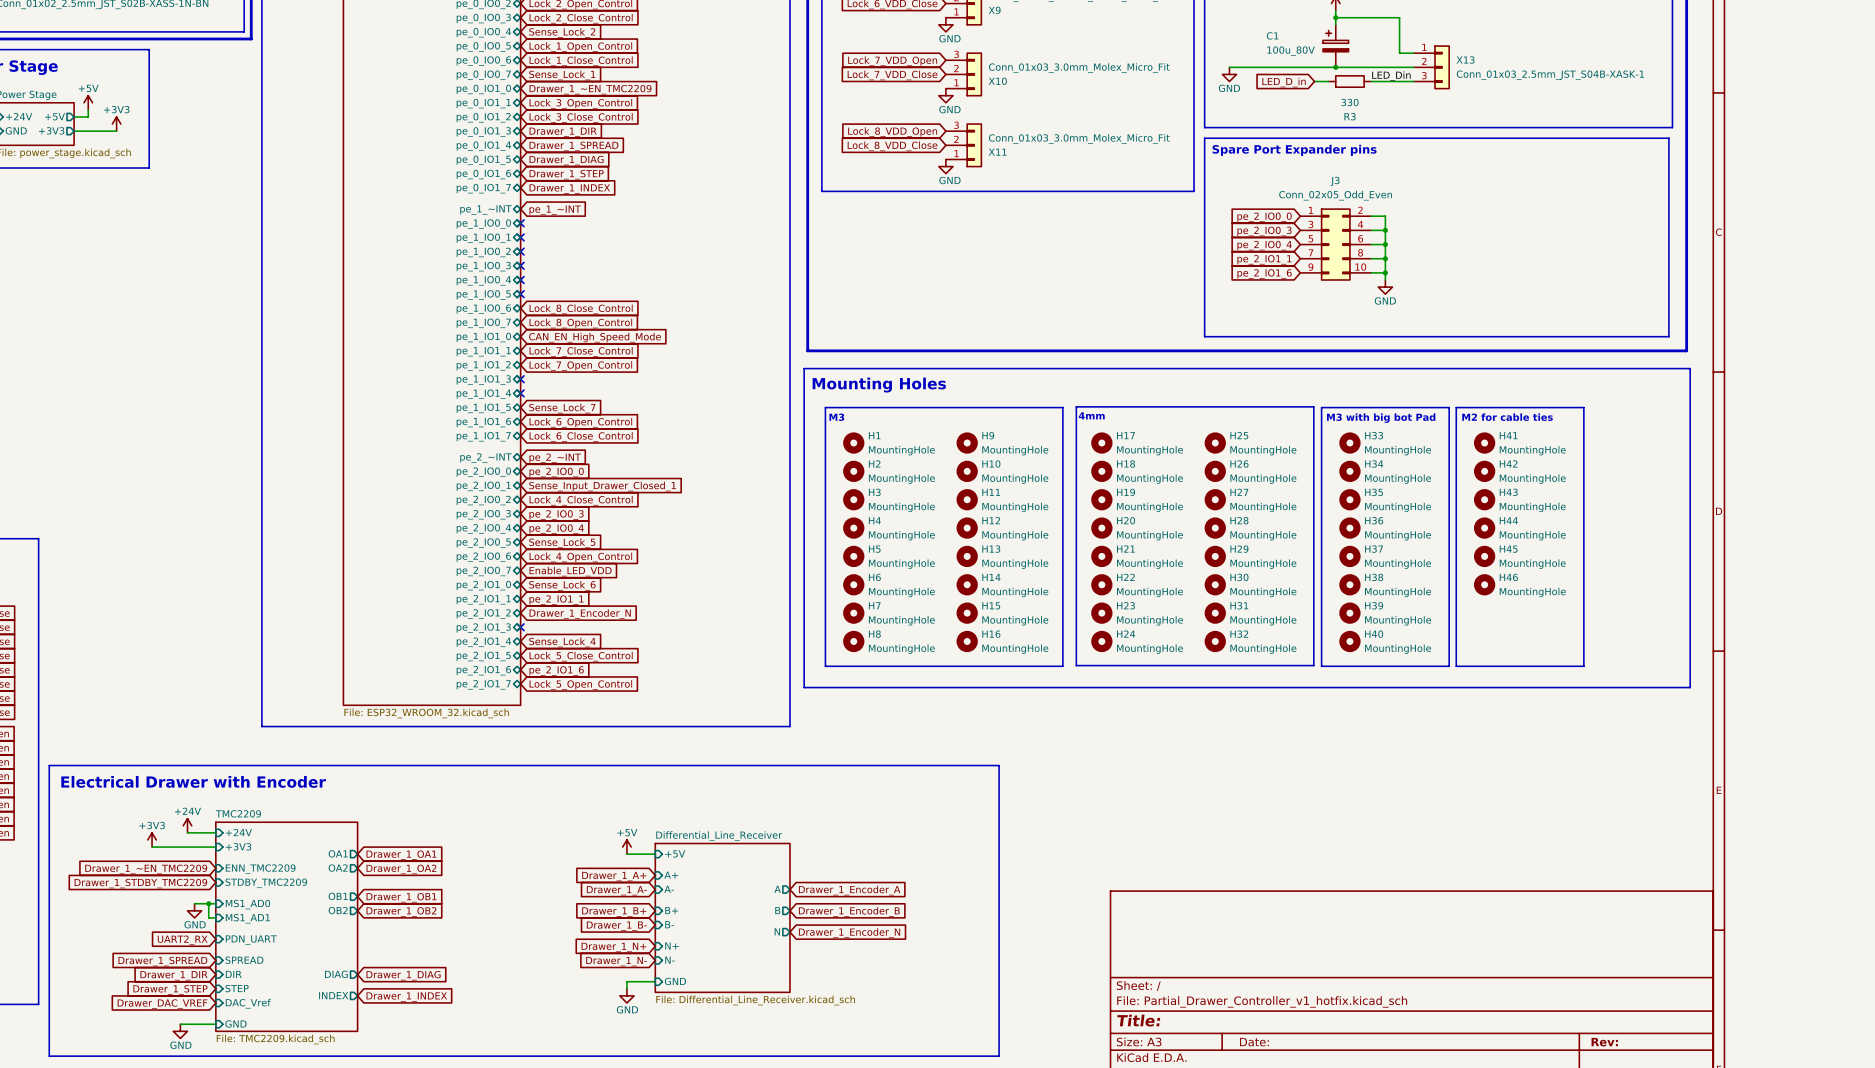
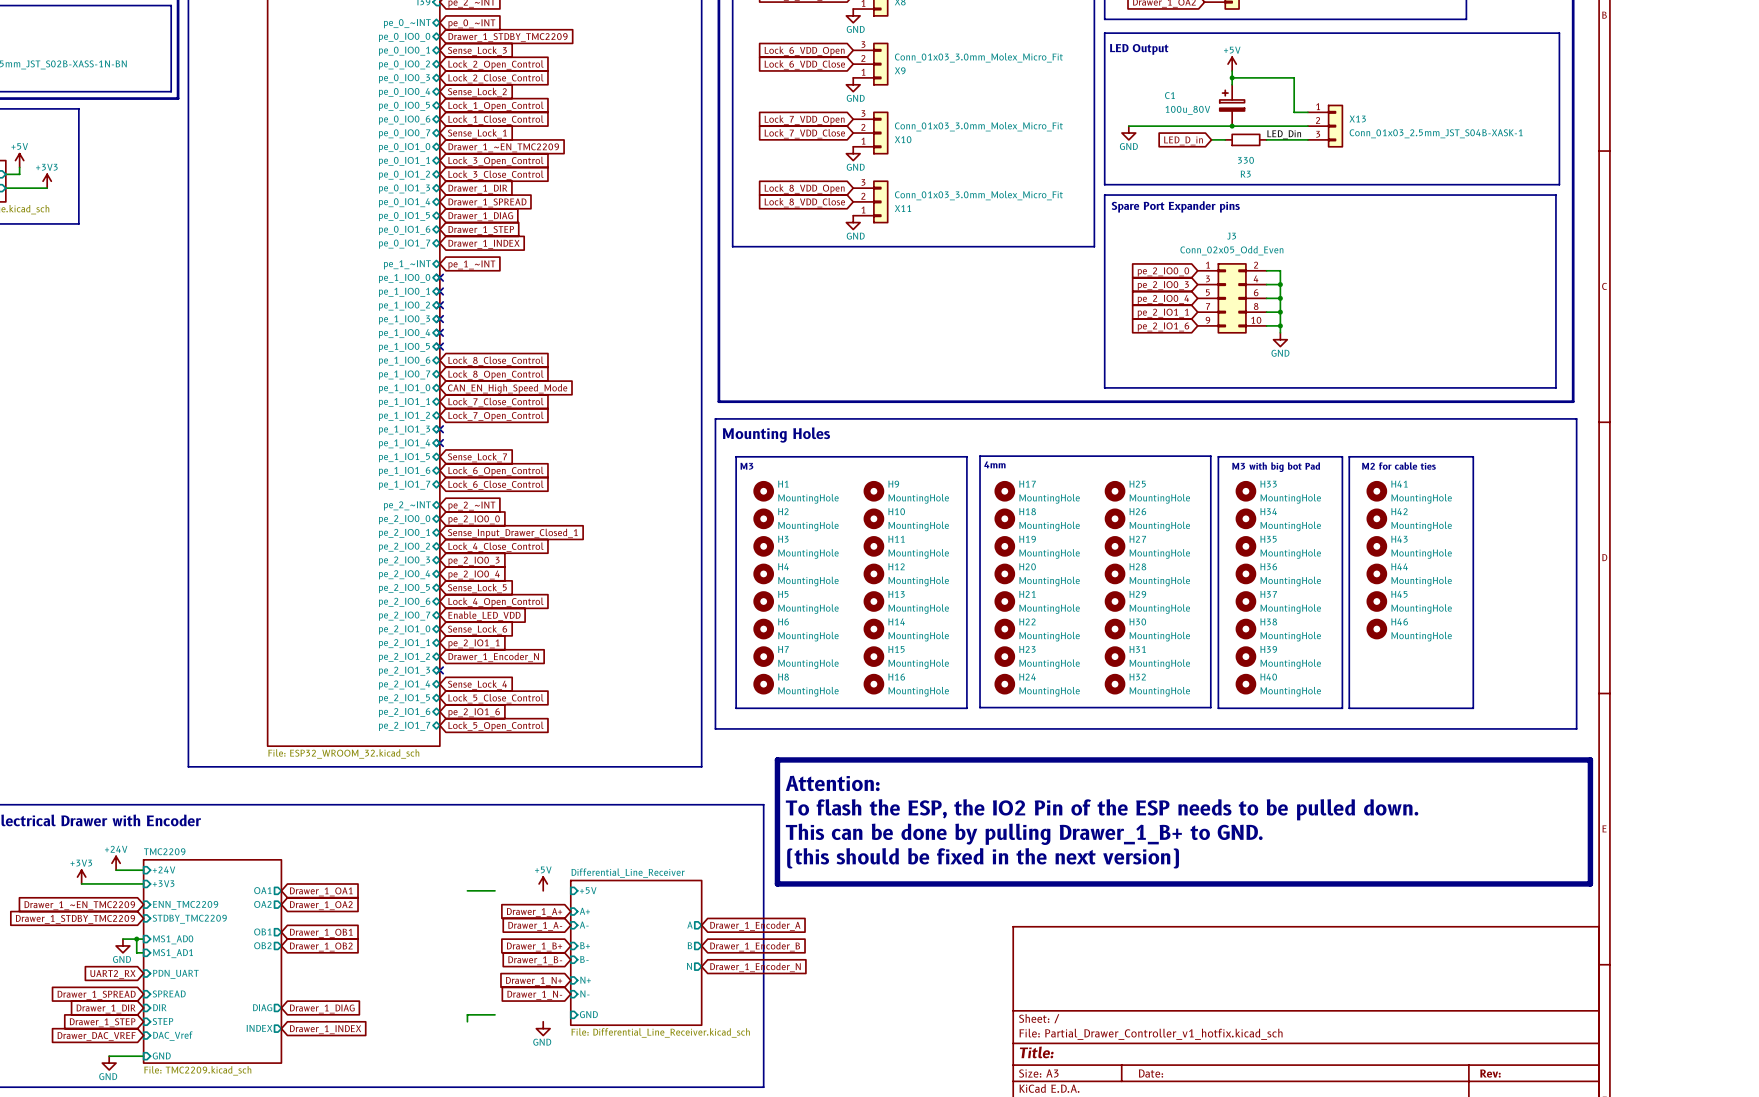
line: none -> (777, 759) (1590, 759) (1590, 883) (777, 883) (777, 759)
text: none -> Attention: (832, 783)
line: (853, 765) (999, 765) (999, 1056) (853, 1056) -> (763, 804) (763, 1087)
text: none -> To flash the ESP, the IO2 Pin of the ESP needs to be pulled down. (1102, 809)
text: none -> This can be done by pulling Drawer_1_B+ to GND. (1024, 834)
text: none -> (this should be fixed in the next version) (983, 858)
wire: (626, 854) (655, 854) -> (467, 890) (494, 890)
wire: (655, 981) (626, 981) (626, 988) -> (494, 1014) (467, 1014) (467, 1021)

